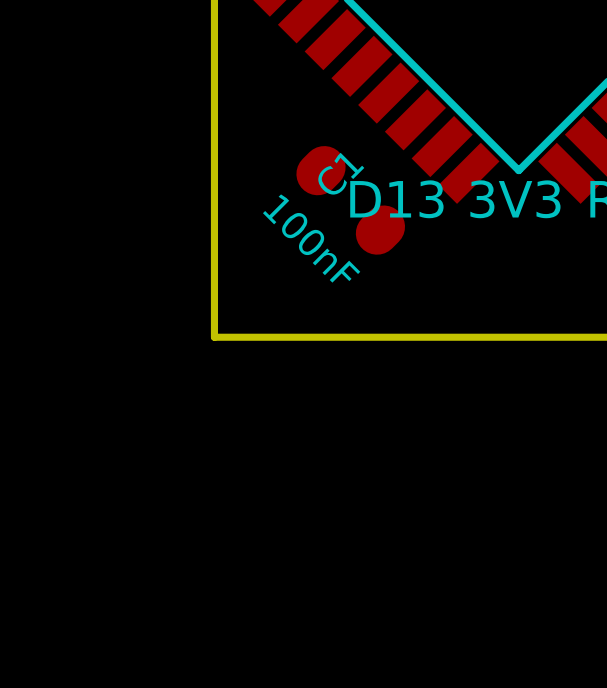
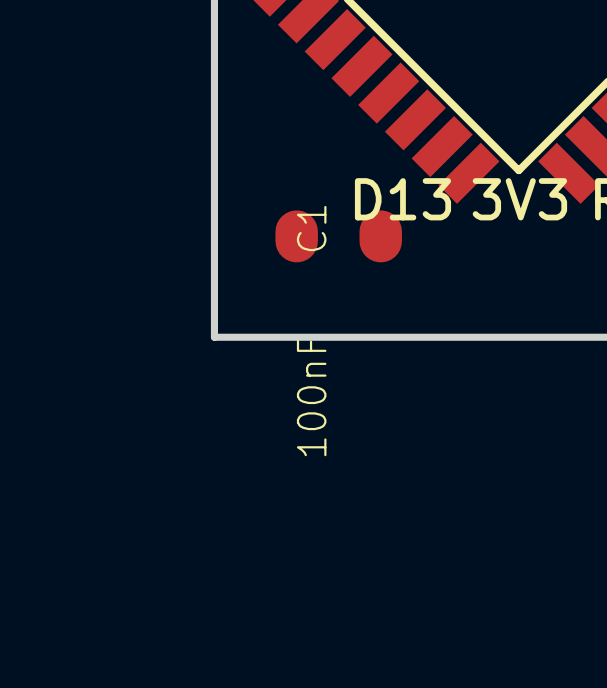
C1 rotation: 0° (350, 200) -> 45° counterclockwise (338, 236)
C1 value position: 100nF (311, 238) -> 100nF (311, 396)

